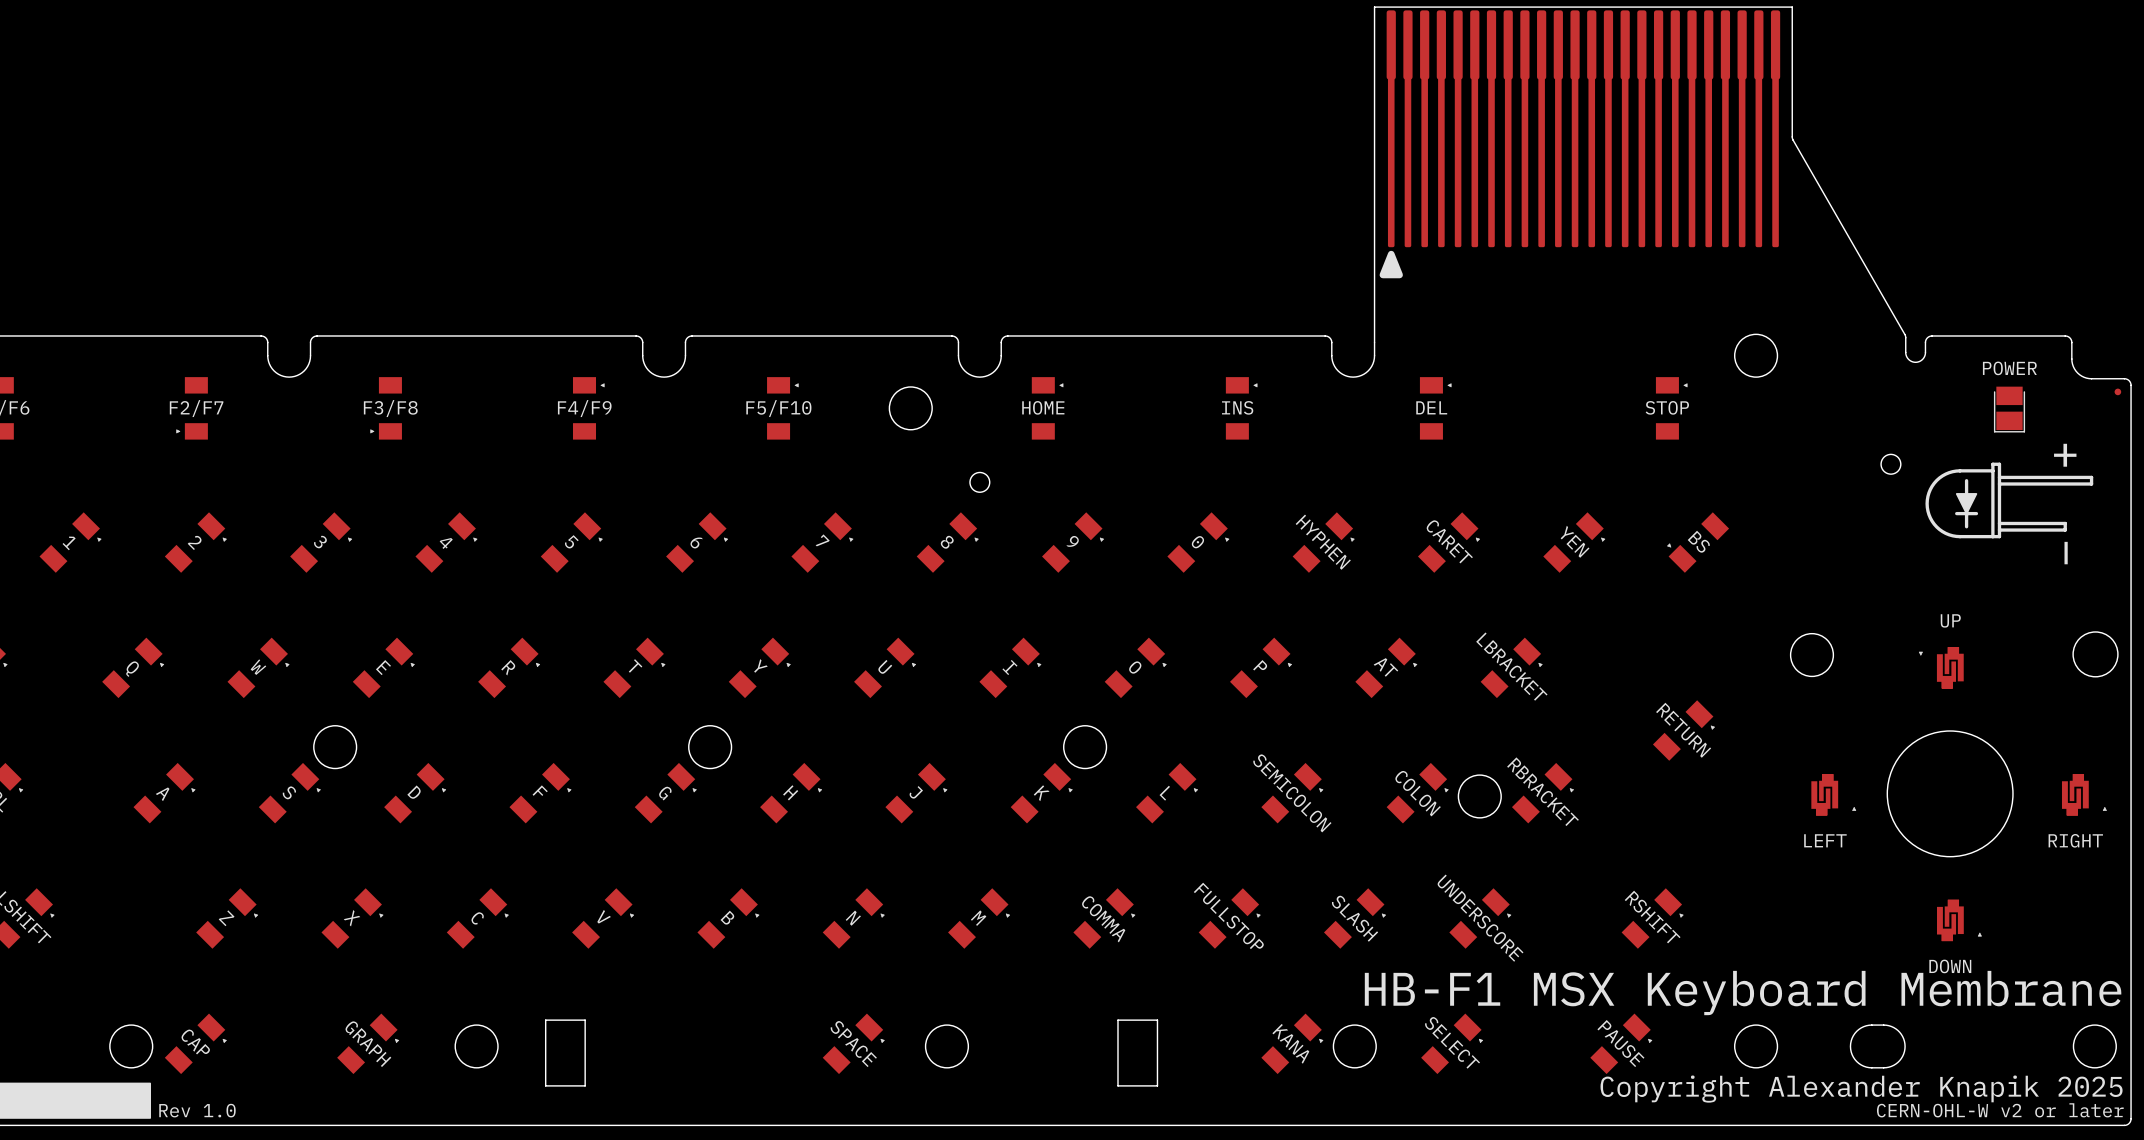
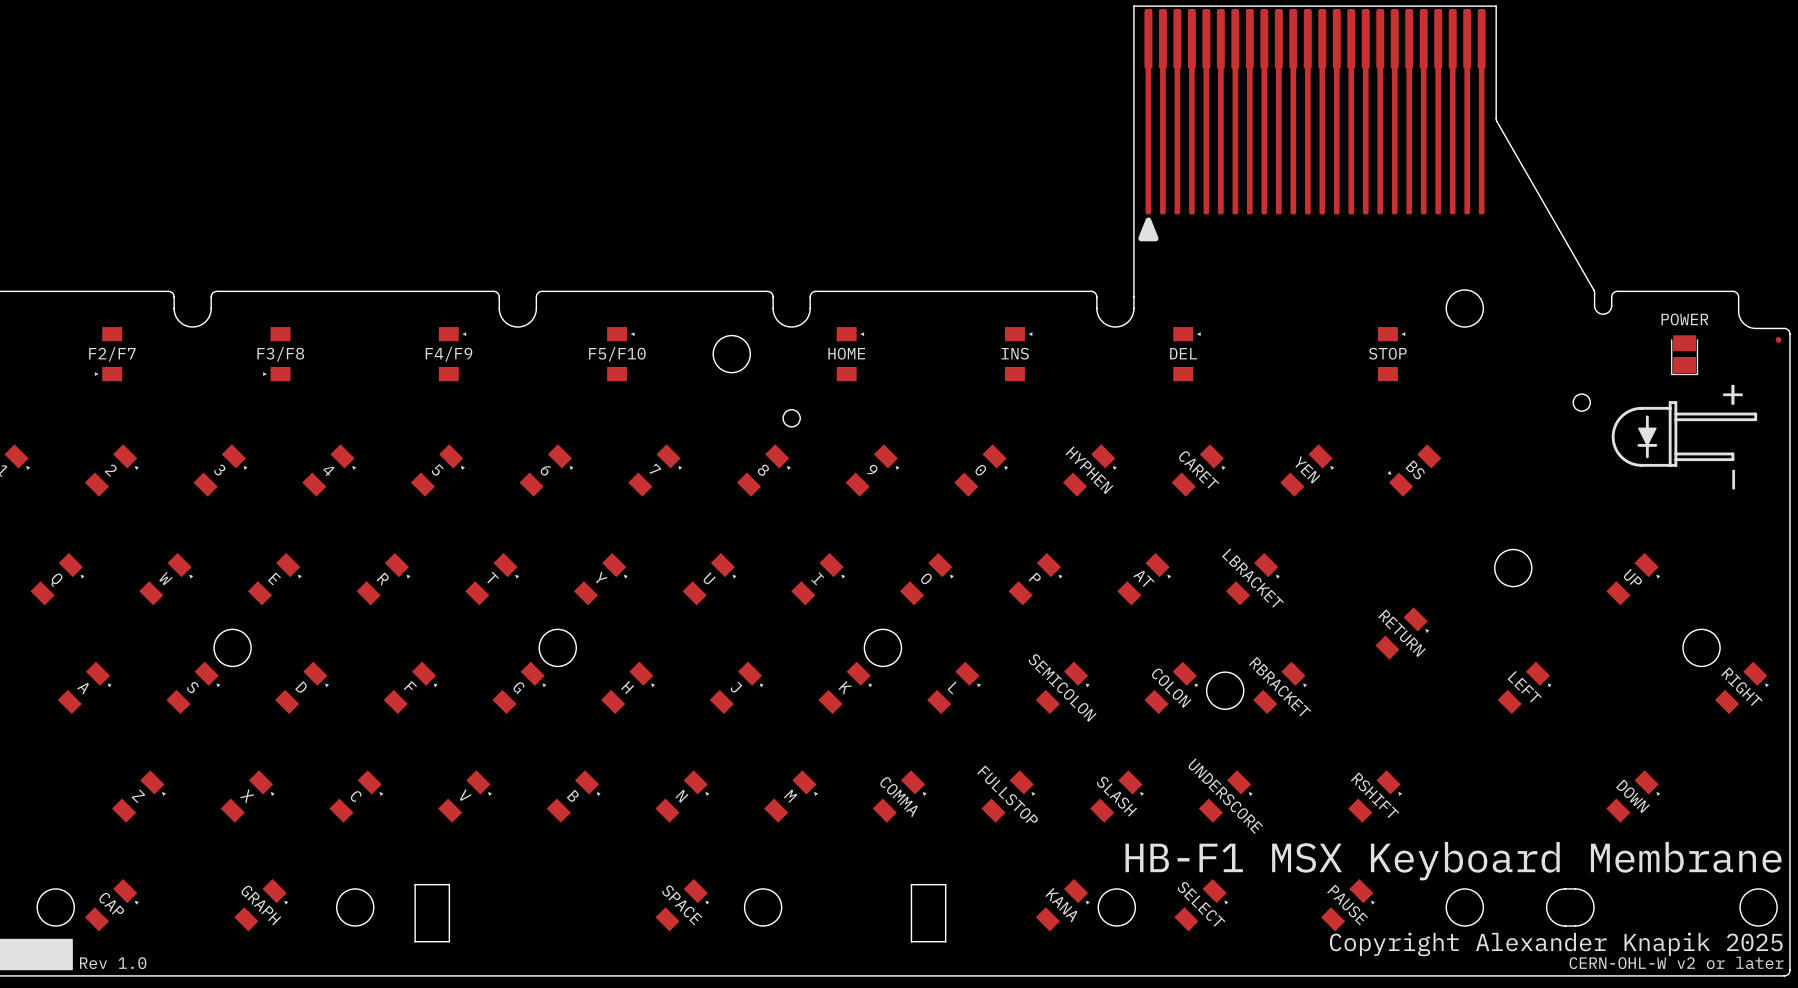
round board edge: [2072, 631, 2119, 677] -> none
part: UP (1941, 667) -> none
part: none -> UP (1633, 579)
round board edge: none -> [1682, 629, 1721, 667]
round board edge: [1887, 730, 2014, 857] -> none
part: none -> LEFT (1524, 687)
part: none -> RIGHT (1741, 687)
part: LEFT (1833, 794) -> none
part: RIGHT (2084, 794) -> none
part: none -> DOWN (1633, 796)
part: DOWN (1959, 920) -> none

